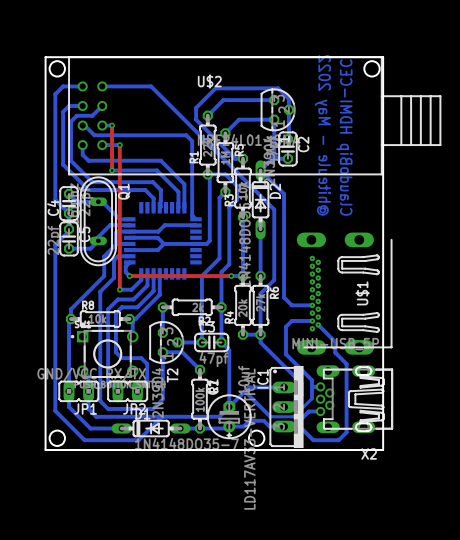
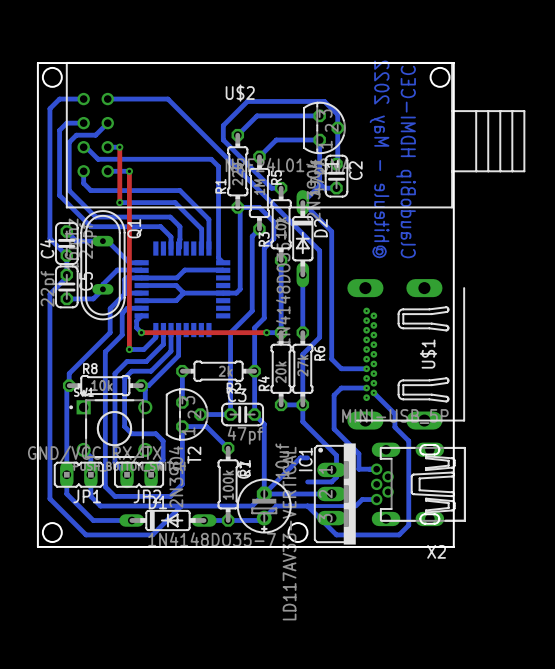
bottom track: (260, 342) (301, 383) (301, 395) (289, 407) -> (302, 414) (302, 421) (336, 455) (336, 477) (331, 481) (307, 481)
bottom track: (306, 374) (311, 380) (311, 398) (293, 416) -> (358, 453) (358, 469) (366, 469)
bottom track: (248, 387) (284, 387) -> (288, 469) (300, 457) (307, 457)
bottom track: (244, 391) (270, 416) -> none
bottom track: none -> (264, 494) (331, 494)
bottom track: (303, 416) (293, 426) (269, 426) (263, 420) (249, 420) (243, 426) (229, 426) -> (314, 506) (276, 506) (264, 518)
bottom track: (296, 423) (313, 440) -> (307, 506) (336, 534) (367, 534)

